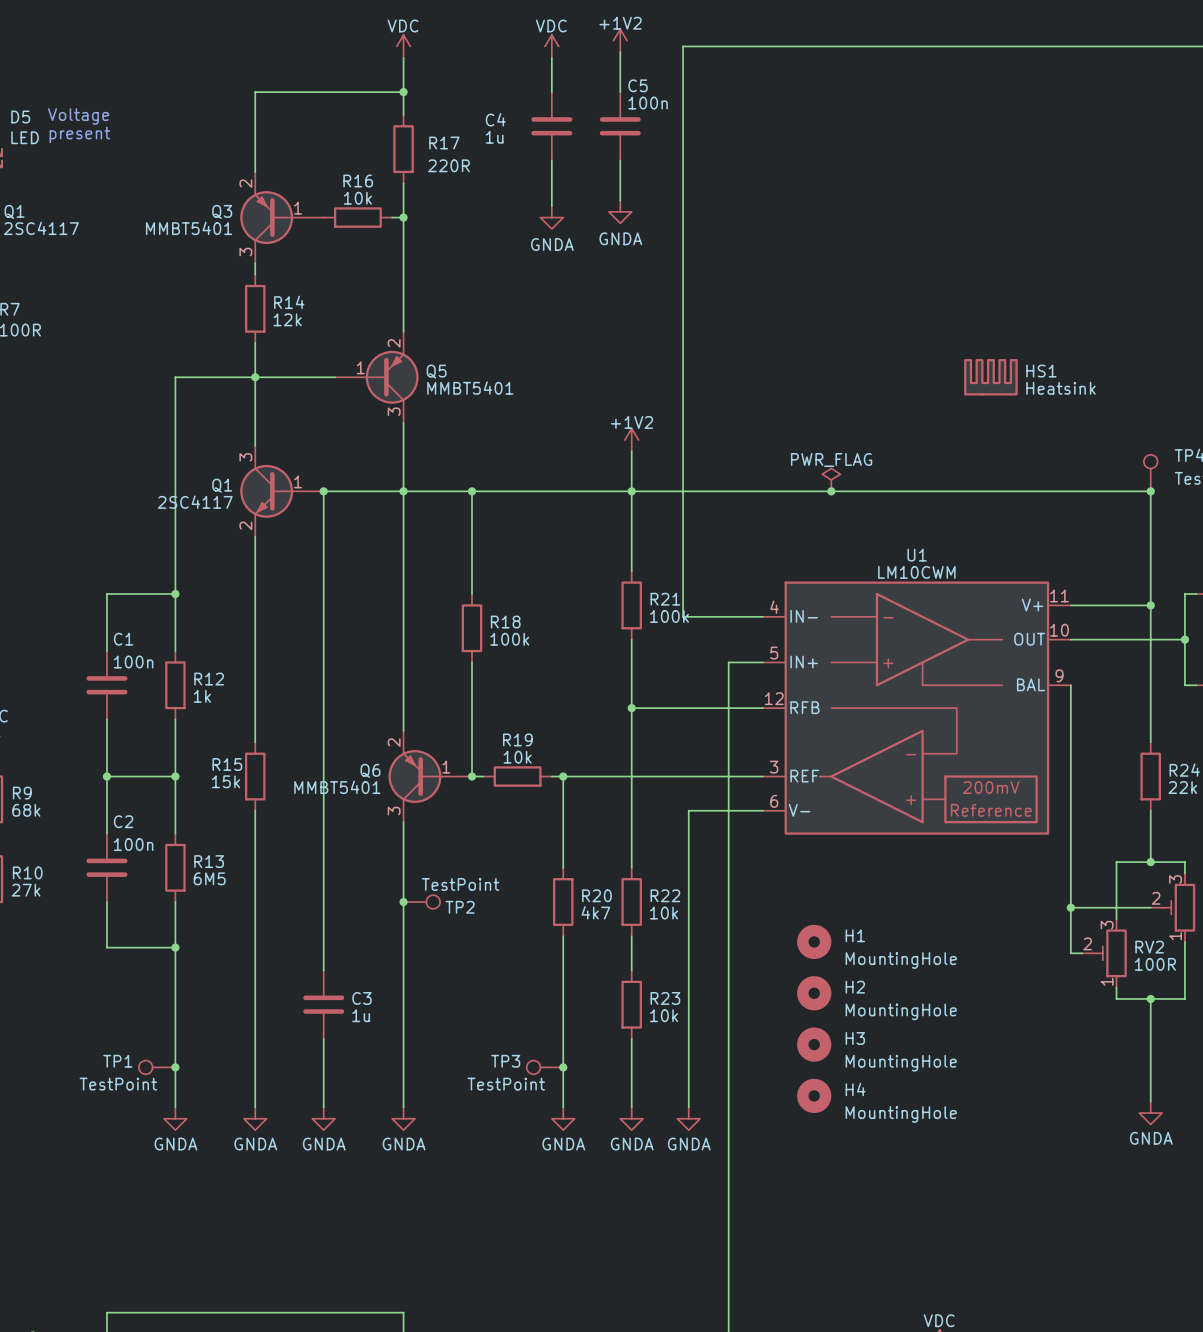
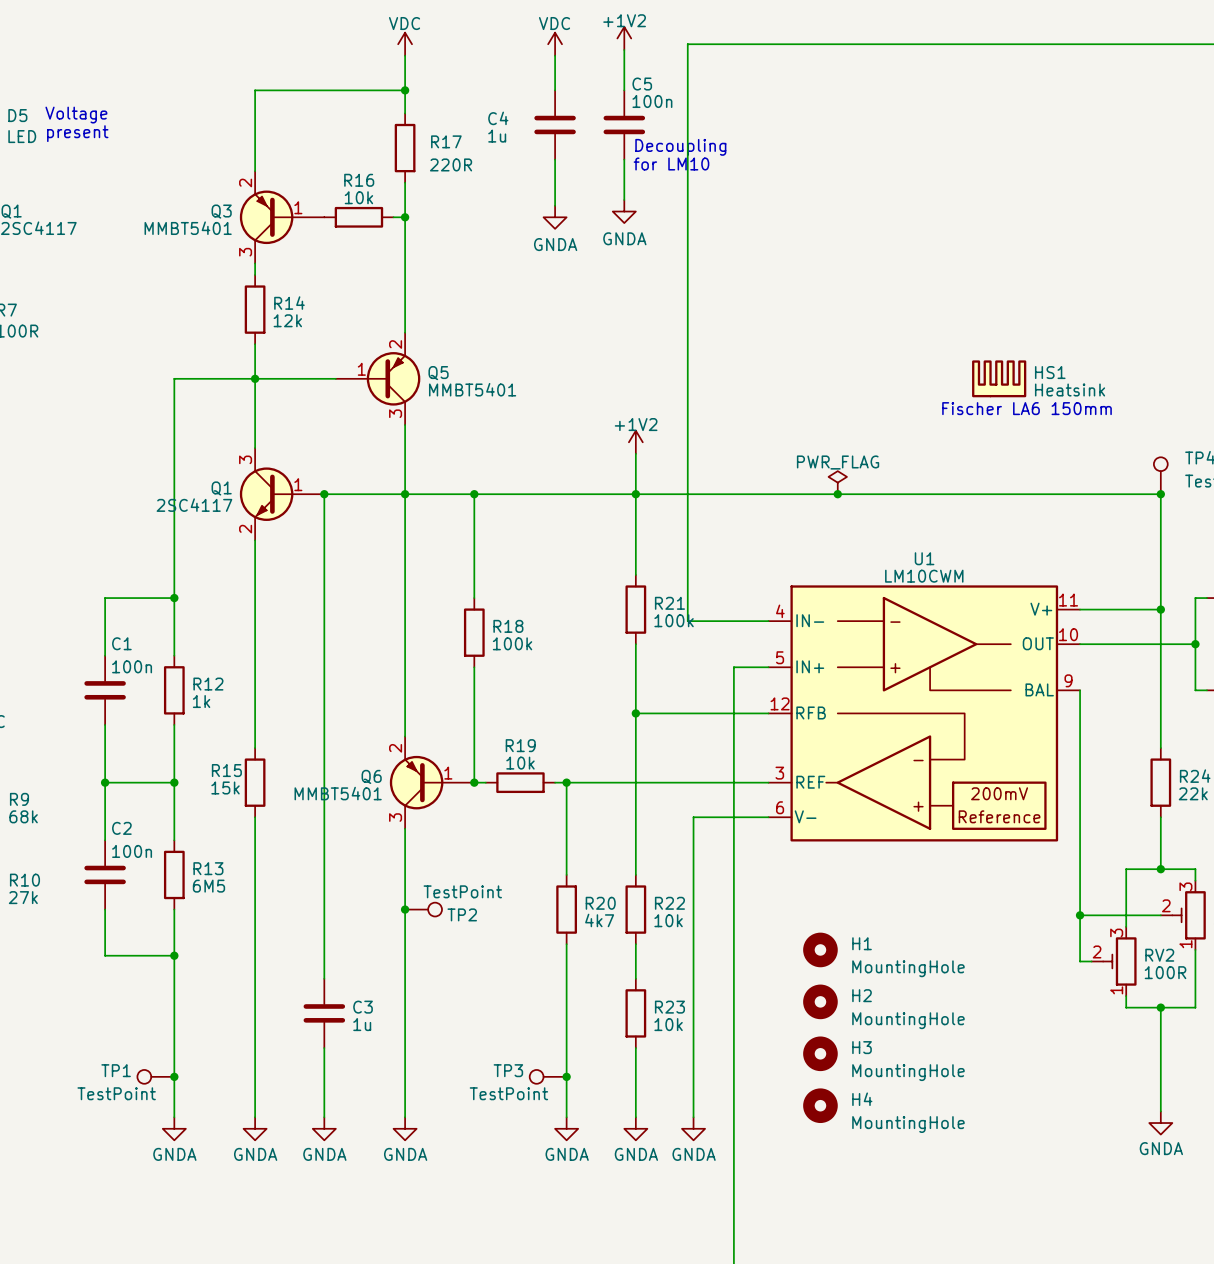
text: none -> Decoupling (680, 147)
text: none -> for LM10 (671, 164)
text: none -> Fischer LA6 150mm (1027, 408)

